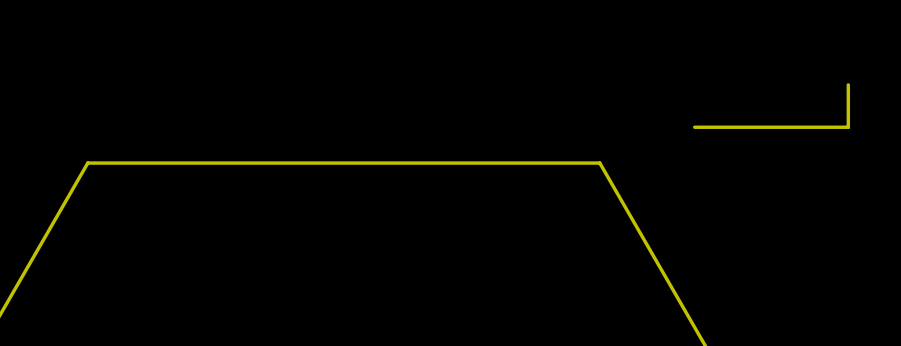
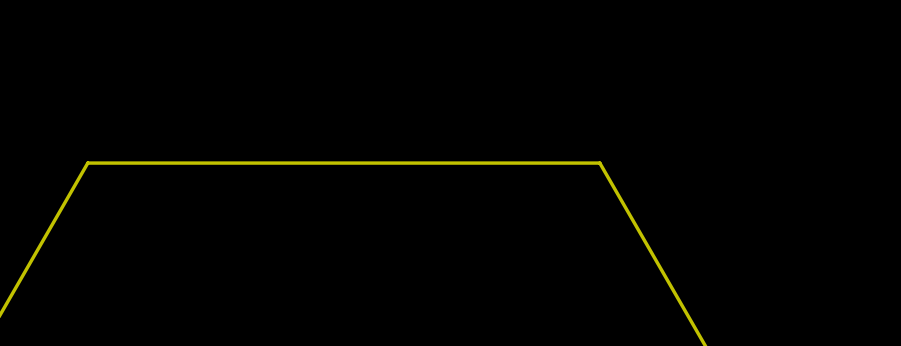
board edge: (848, 84) (848, 127) (694, 127) -> none

